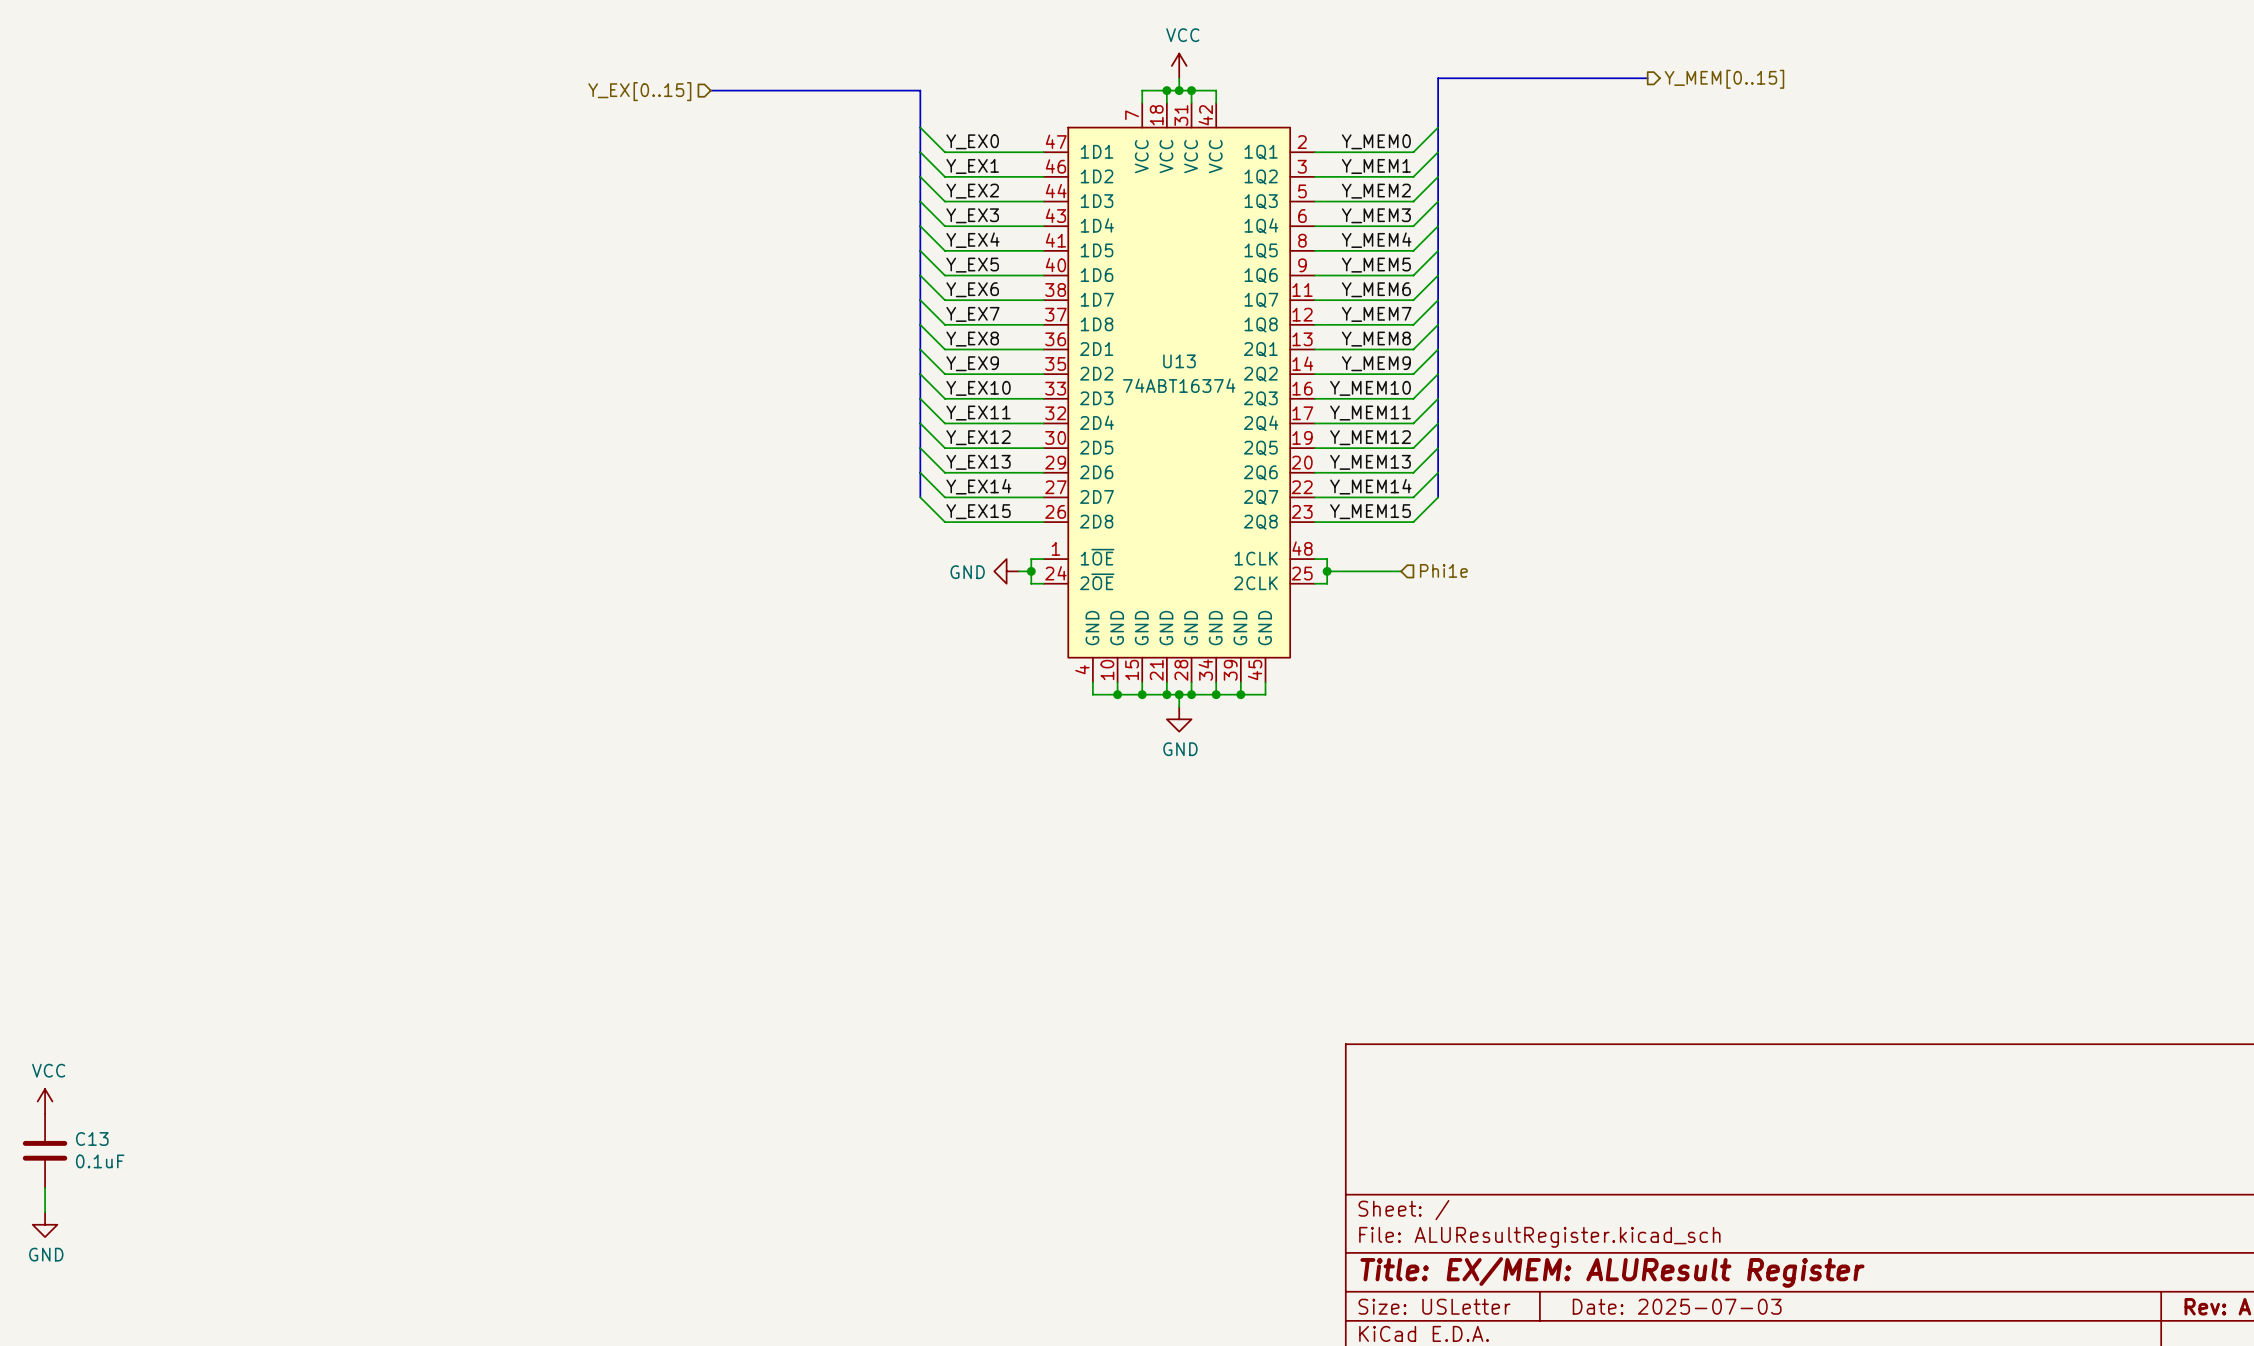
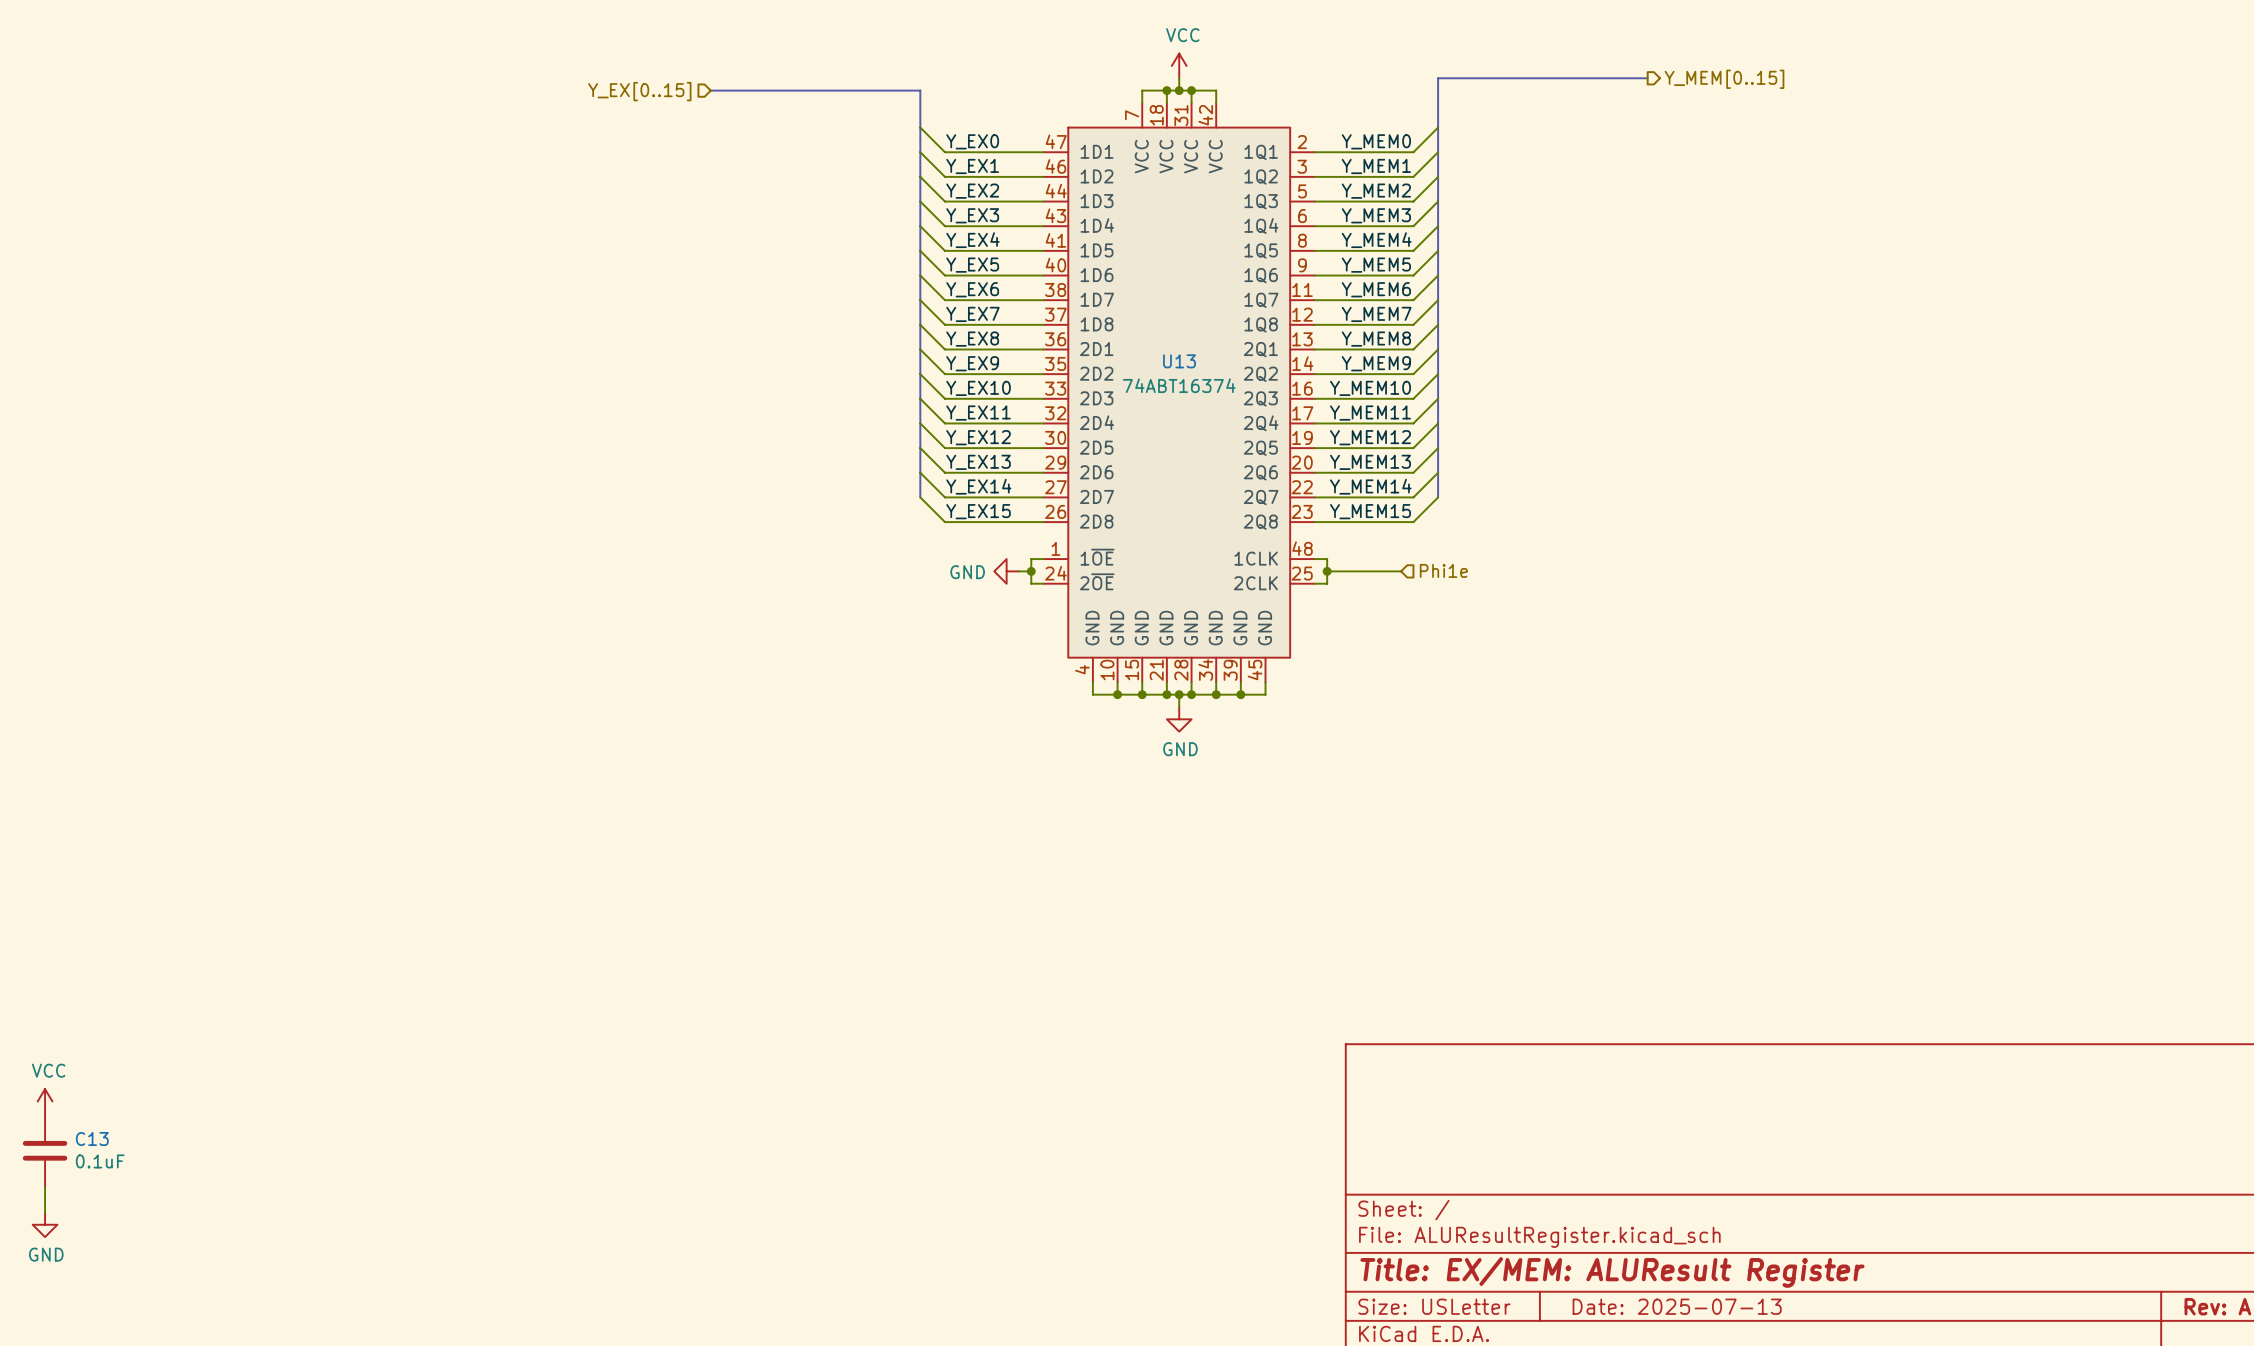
title block: Date: 2025-07-03 (1677, 1306) -> Date: 2025-07-13 (1677, 1306)

